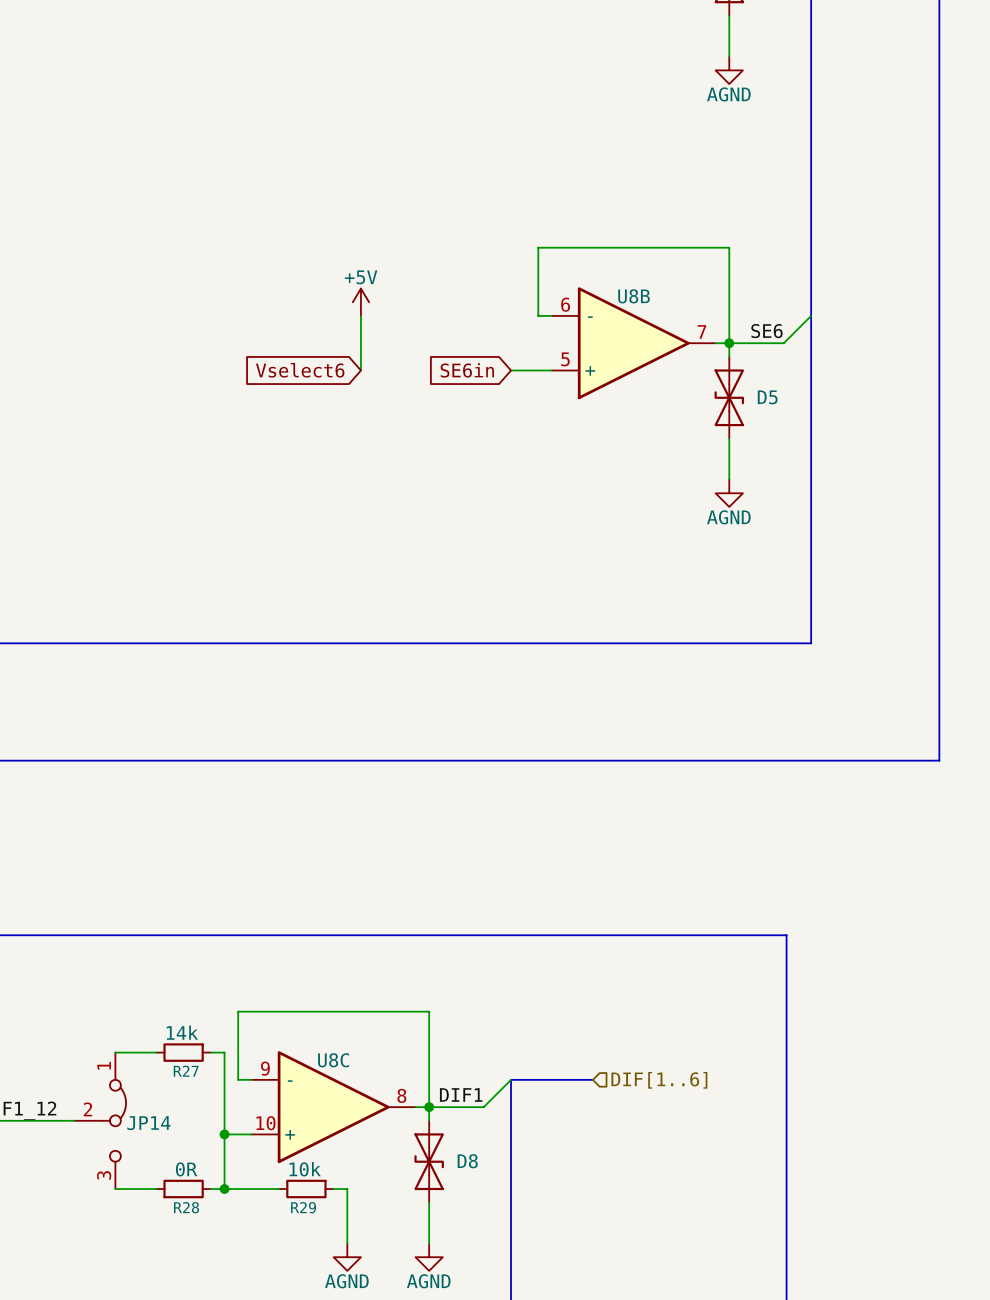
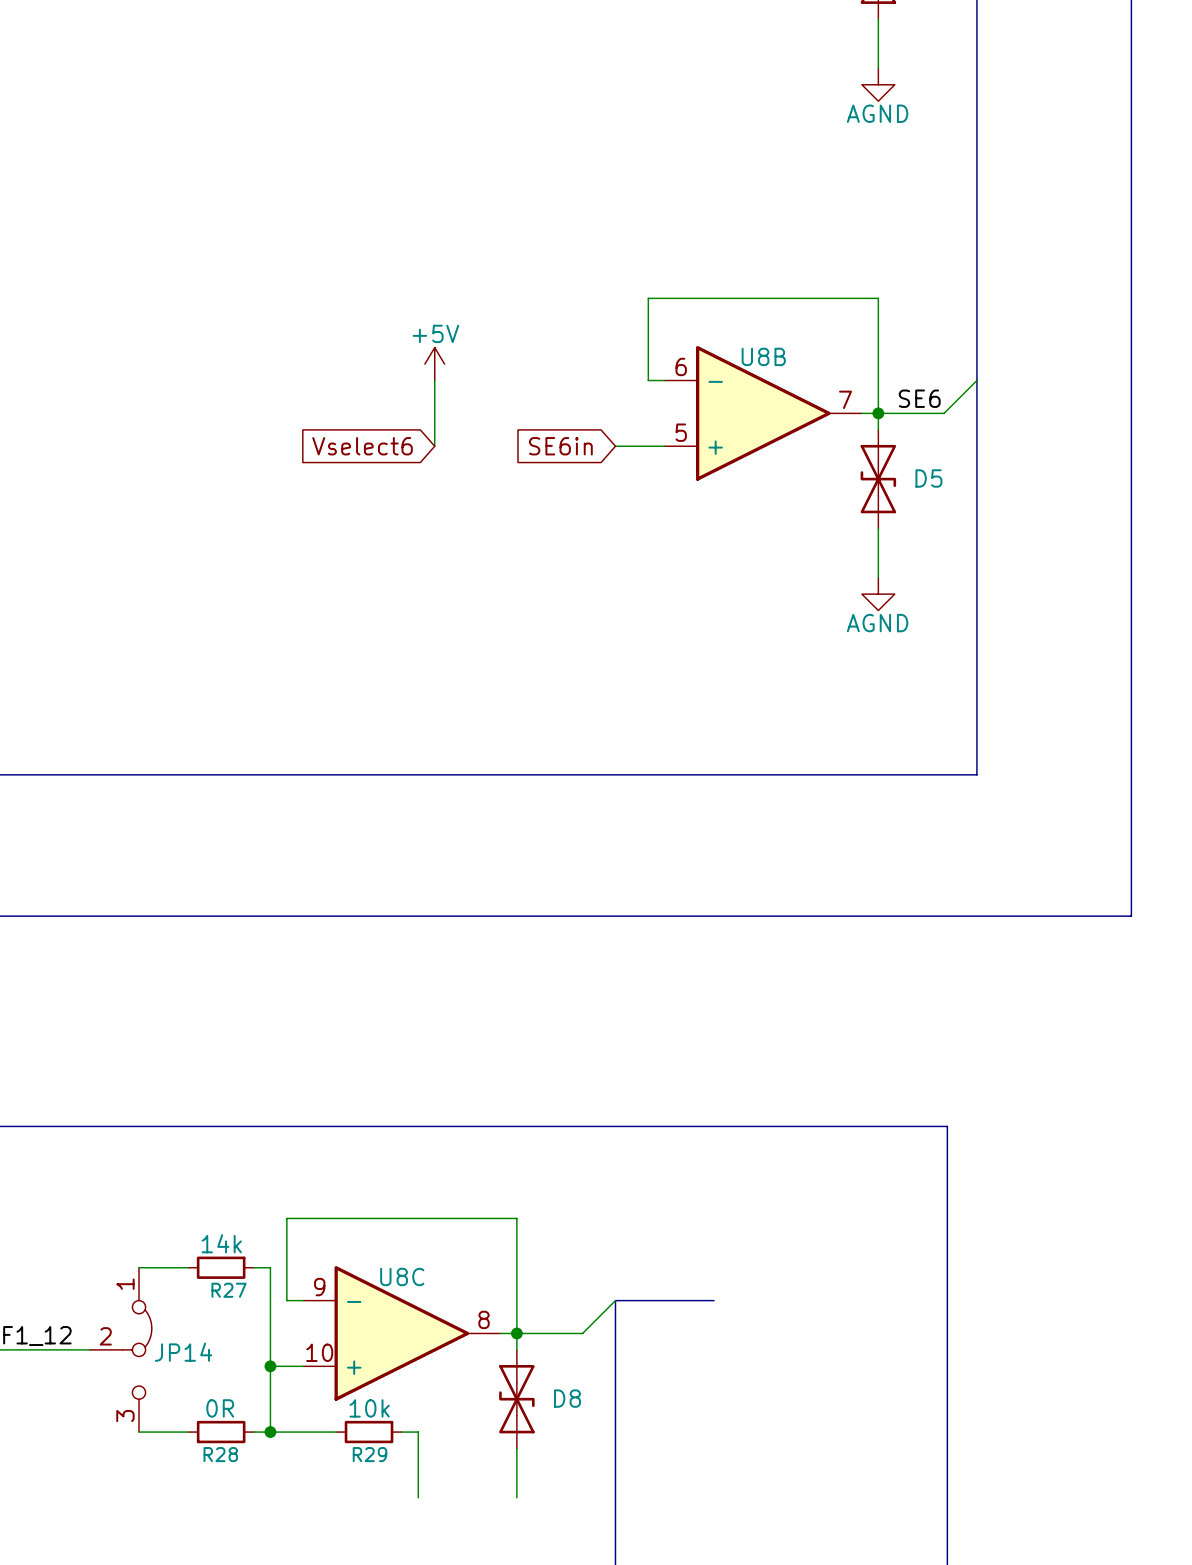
hierarchical label: DIF[1..6] (659, 1080) -> none
label: DIF1 (461, 1094) -> none
power symbol: AGND (347, 1257) -> none
power symbol: AGND (429, 1257) -> none

